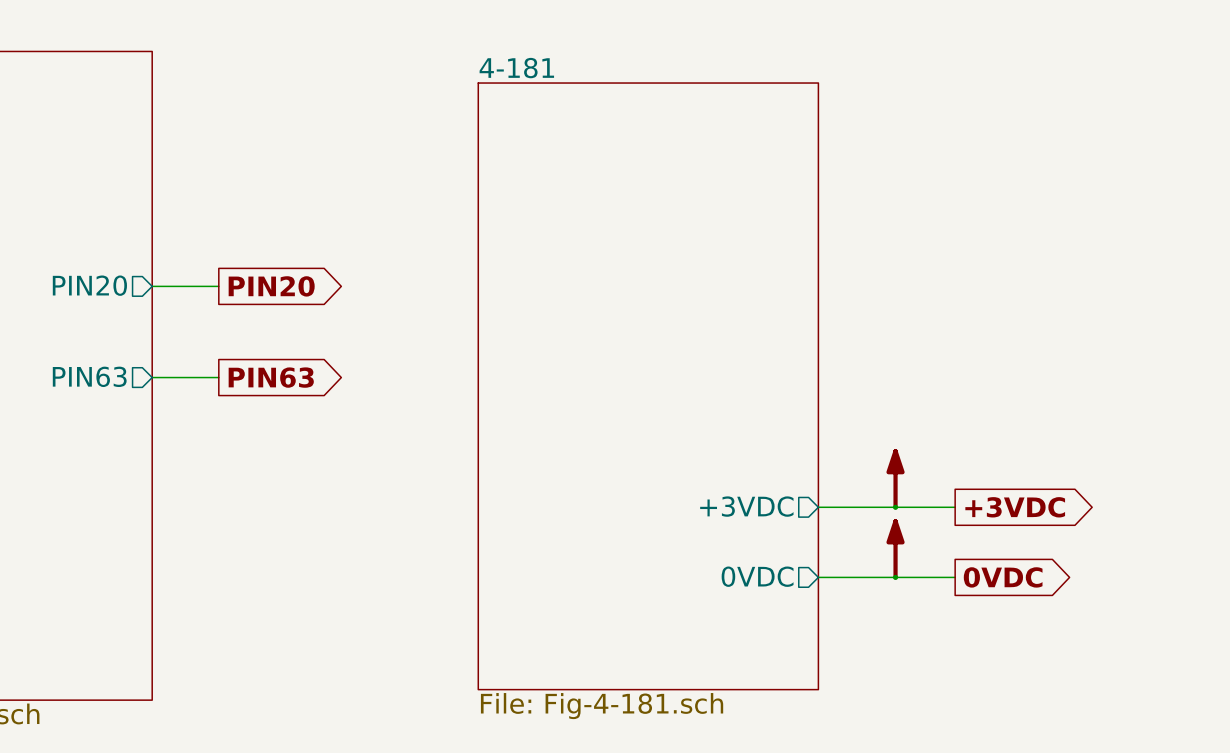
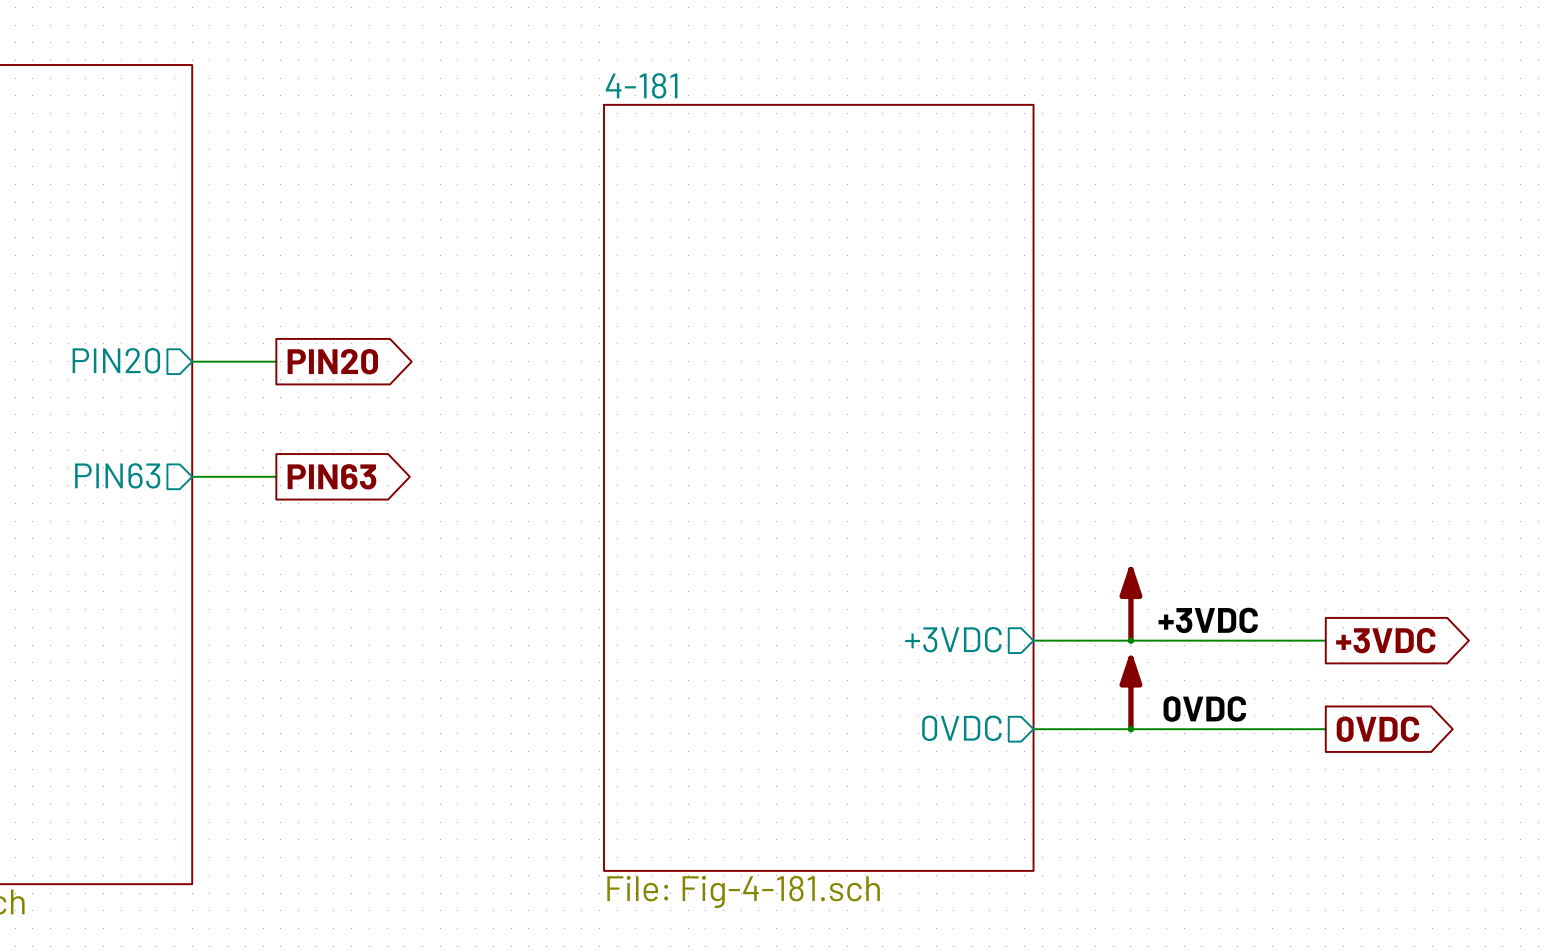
label: none -> +3VDC (1208, 620)
wire: none -> (1206, 640) (1325, 640)
global label position: +3VDC (1015, 507) -> +3VDC (1385, 640)
label: none -> 0VDC (1204, 709)
wire: none -> (1206, 729) (1325, 729)
global label position: 0VDC (1003, 577) -> 0VDC (1377, 729)

